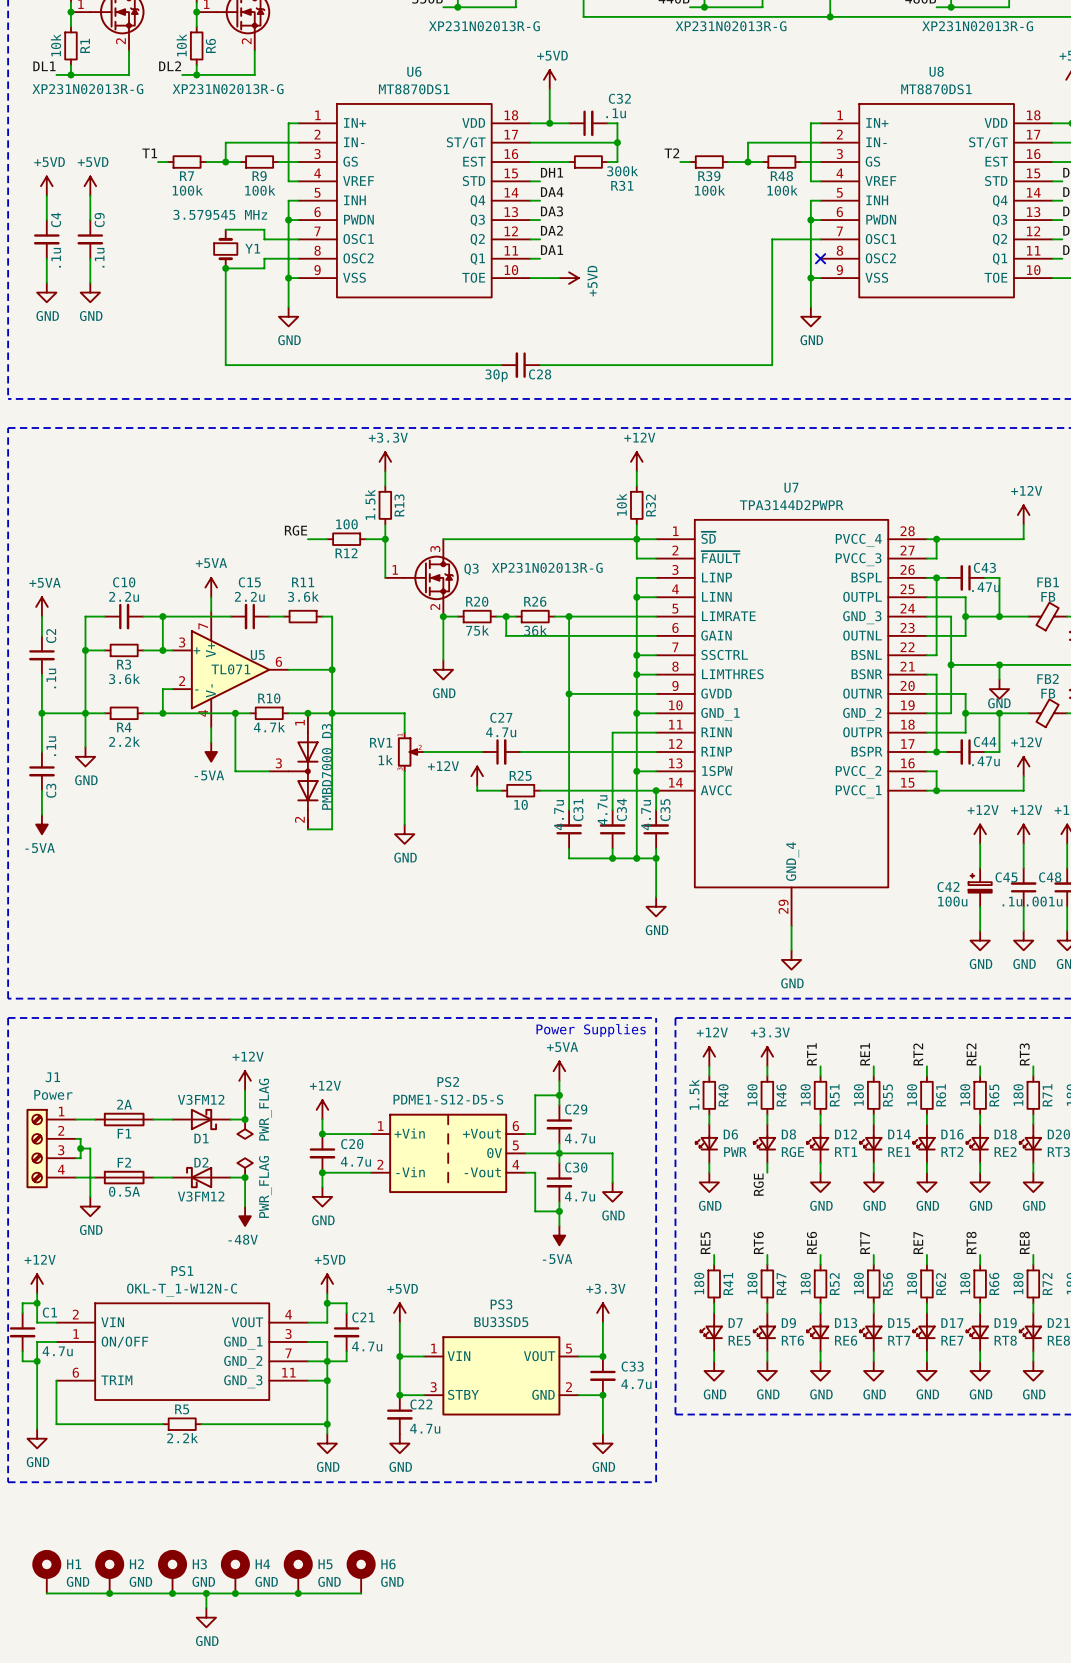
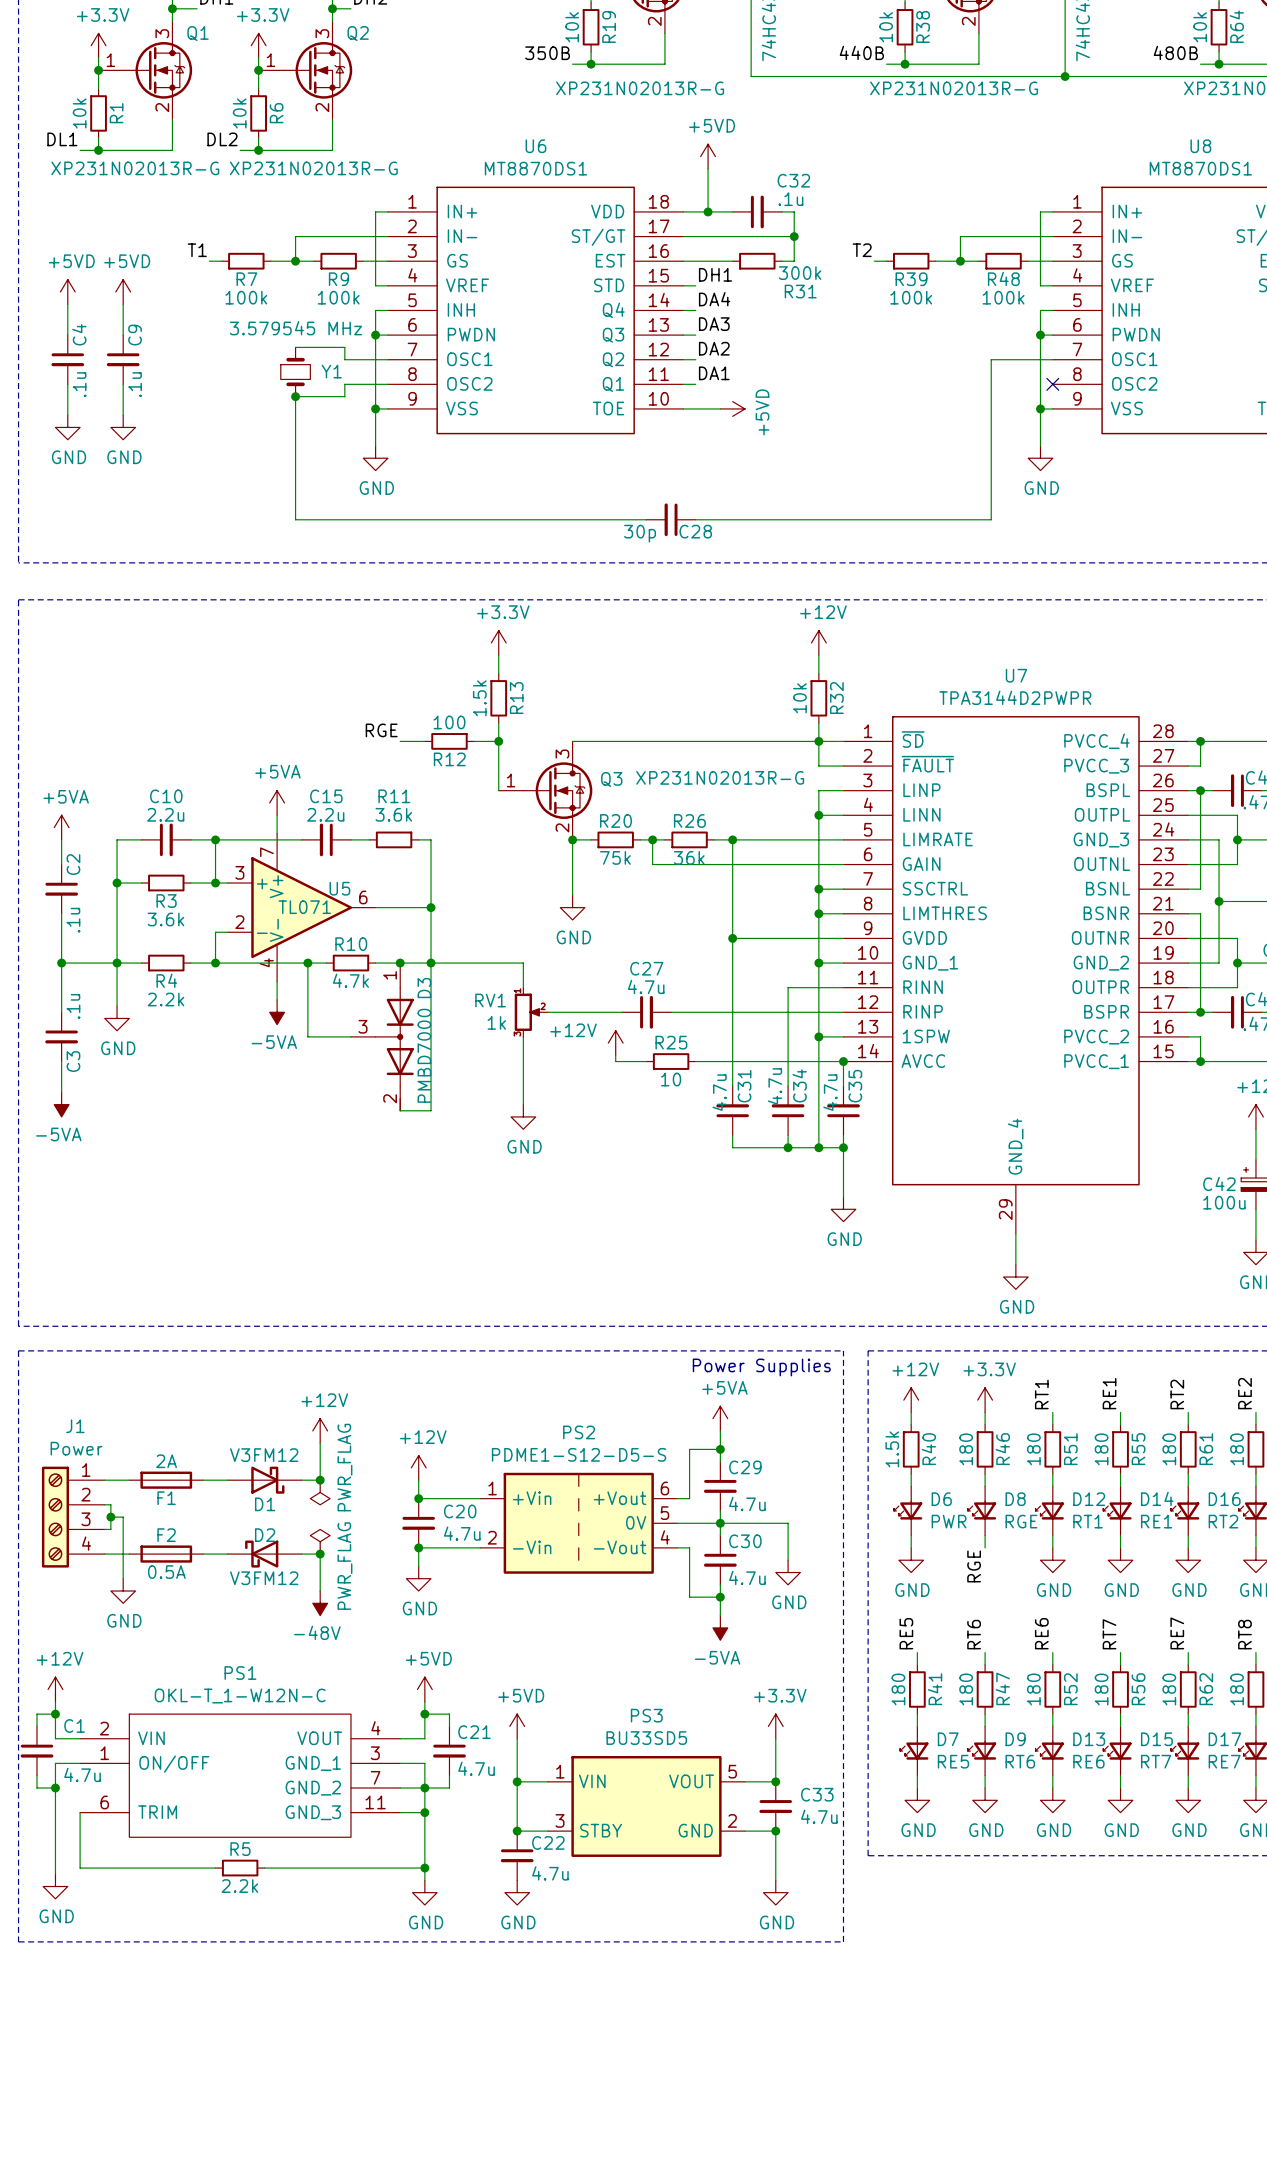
H1: GND (46, 1571) -> none
H2: GND (109, 1571) -> none
H3: GND (172, 1571) -> none
H4: GND (235, 1571) -> none
H5: GND (298, 1571) -> none
H6: GND (361, 1571) -> none
wire: (46, 1593) (361, 1593) -> none
junction: (109, 1593) -> none
junction: (172, 1593) -> none
wire: (206, 1593) (206, 1607) -> none
junction: (206, 1593) -> none
junction: (235, 1593) -> none
junction: (298, 1593) -> none
power symbol: GND (206, 1617) -> none

